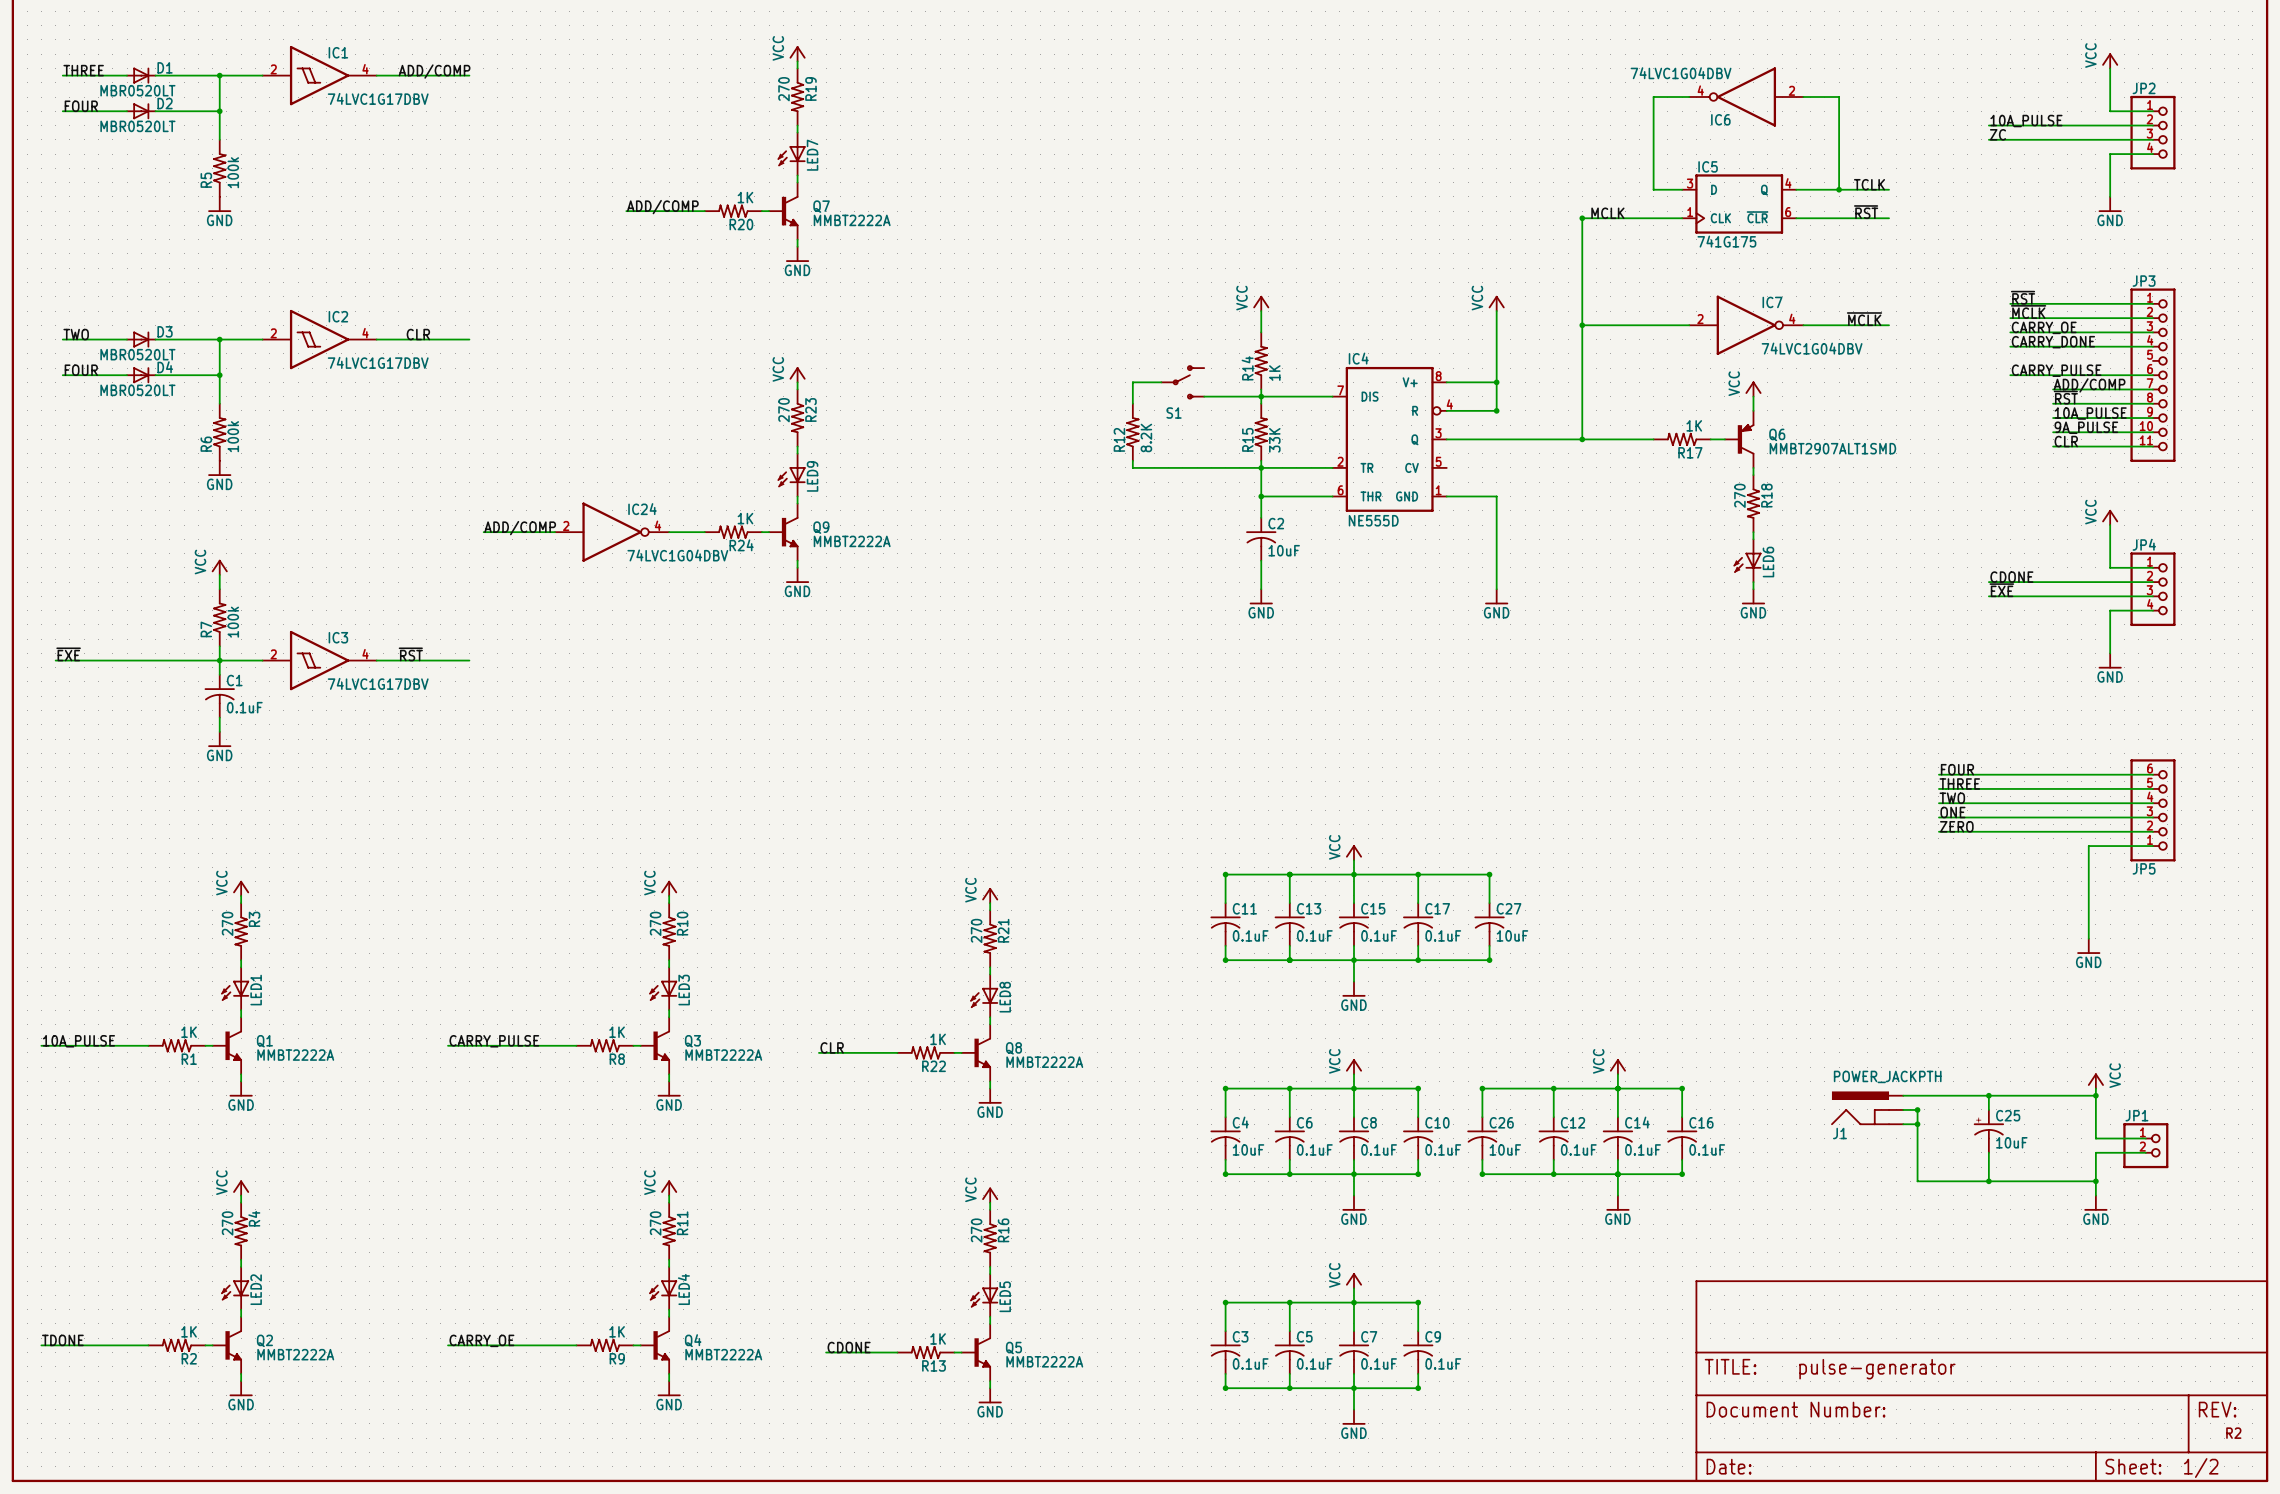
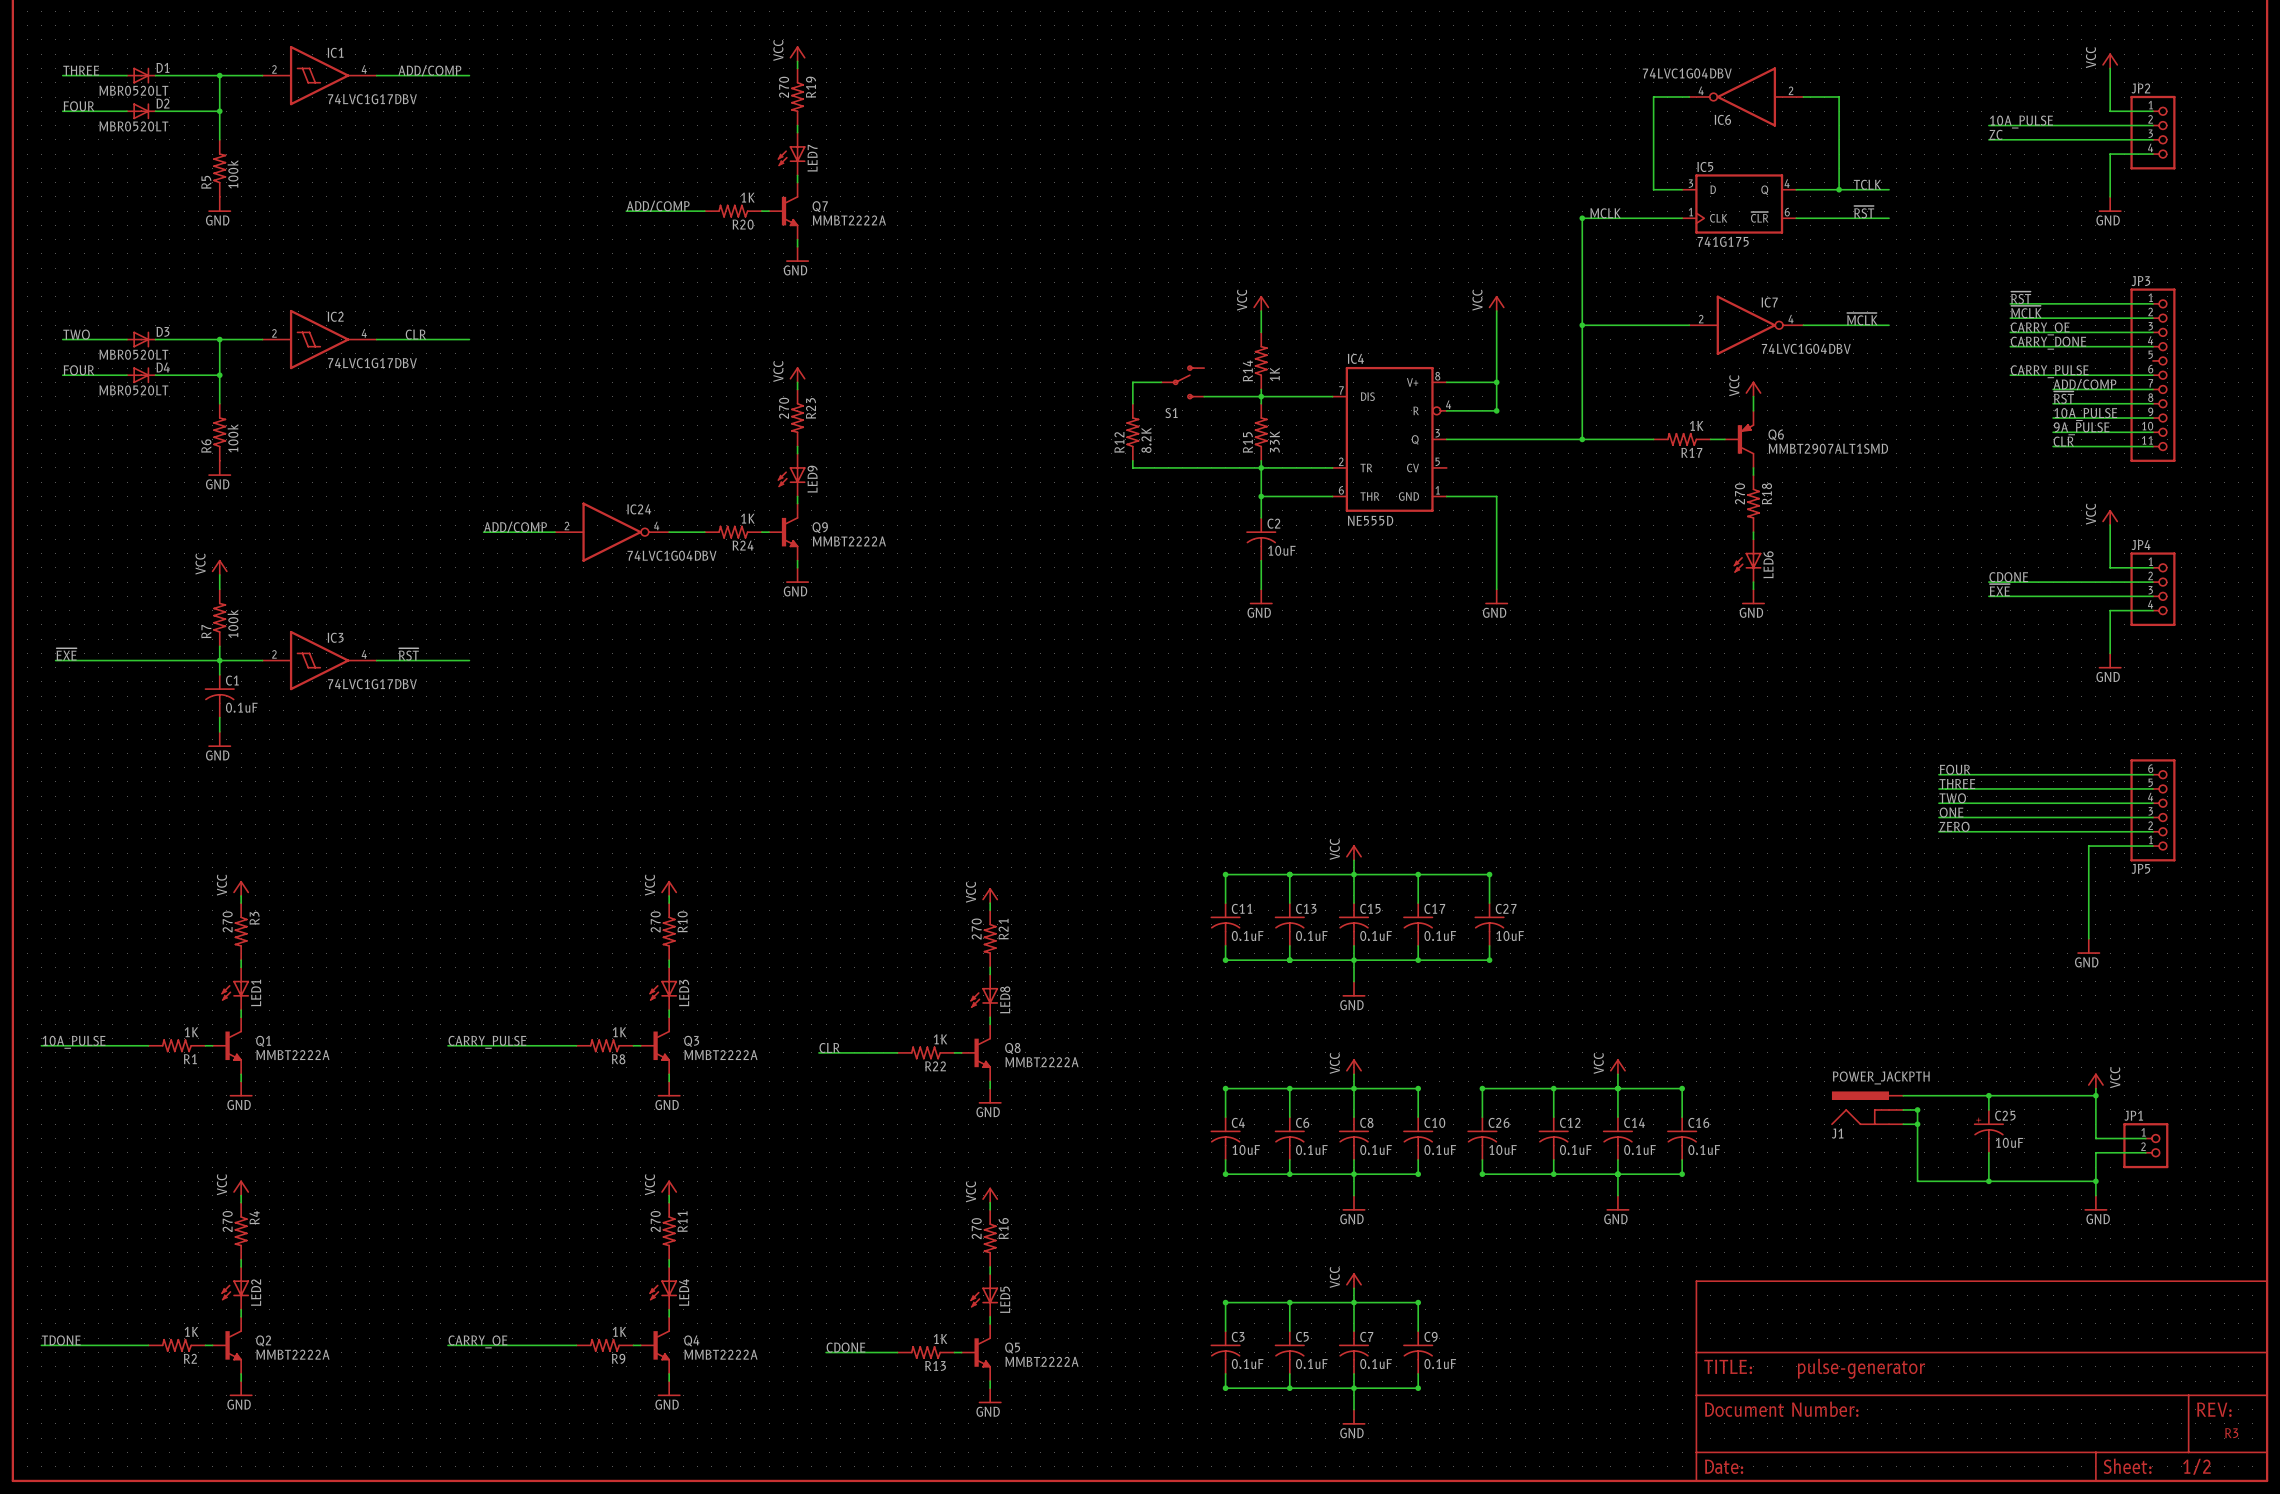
text: R2 (2233, 1433) -> R3 (2231, 1433)

